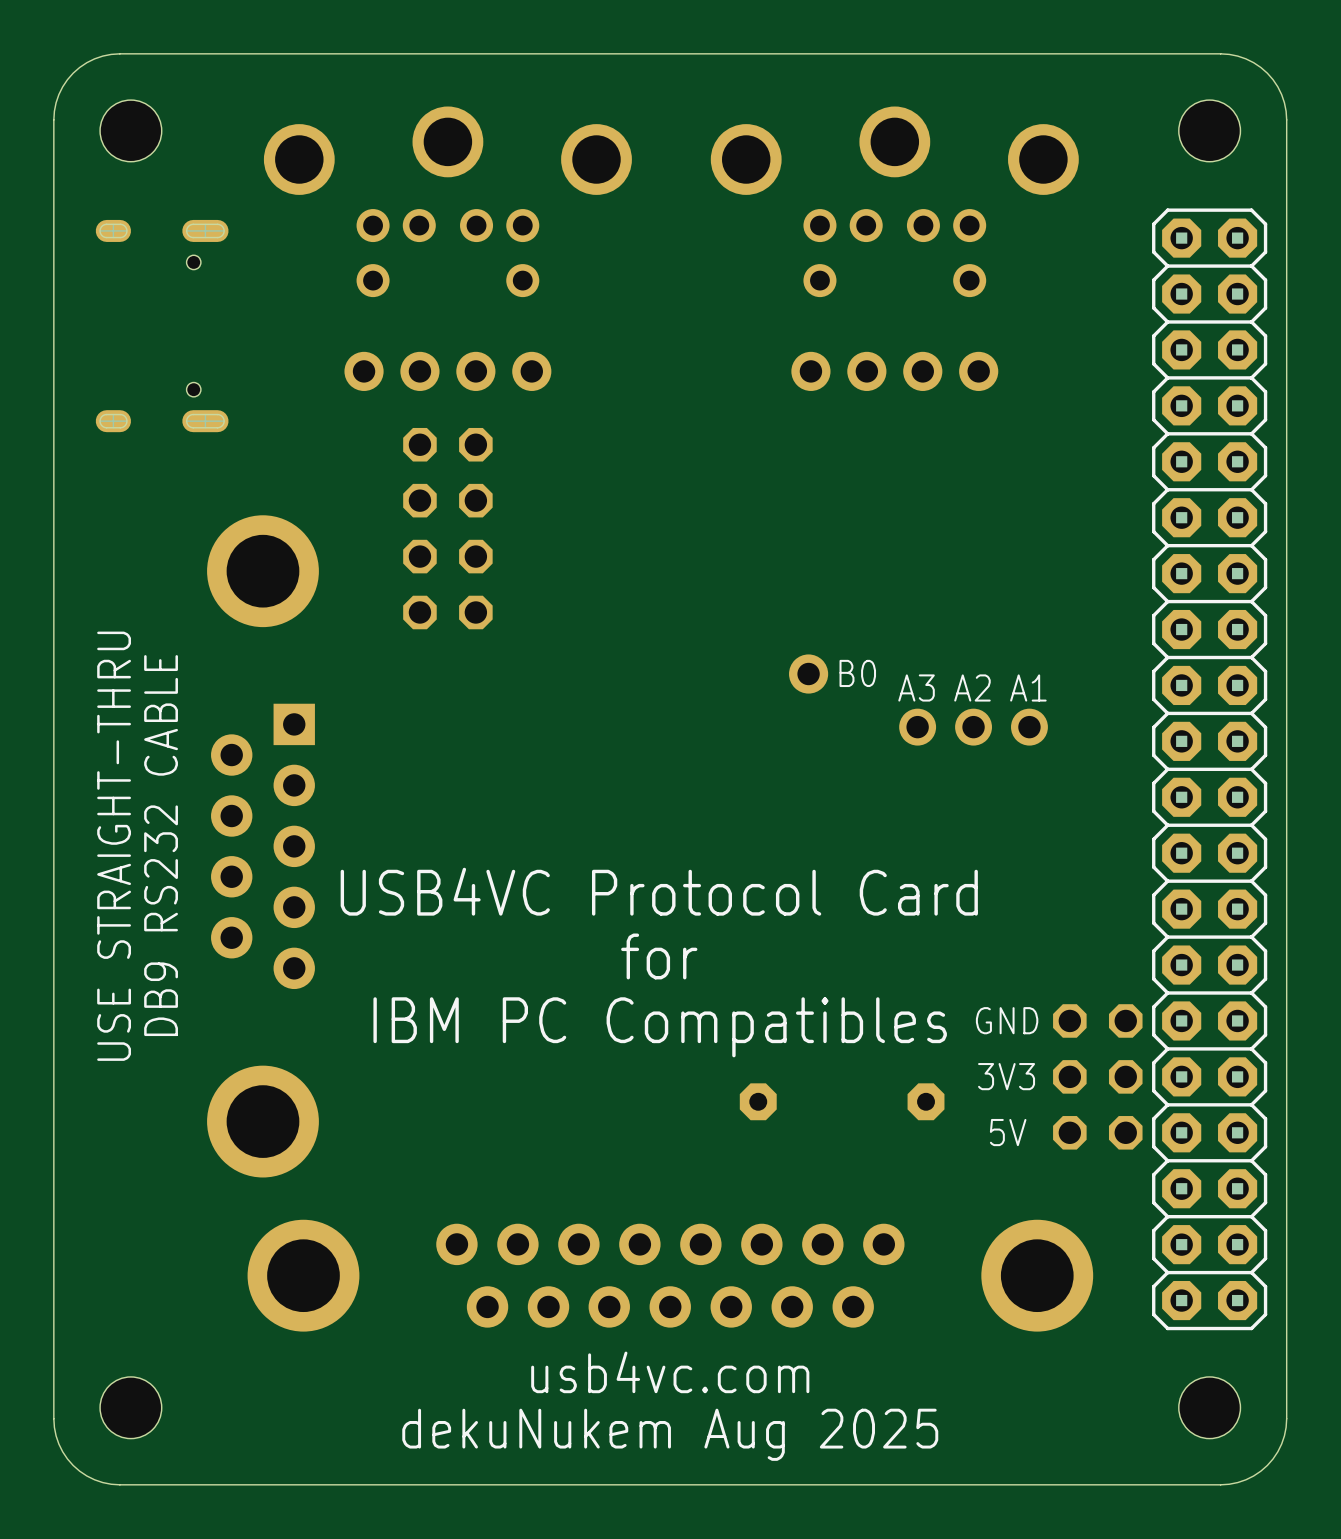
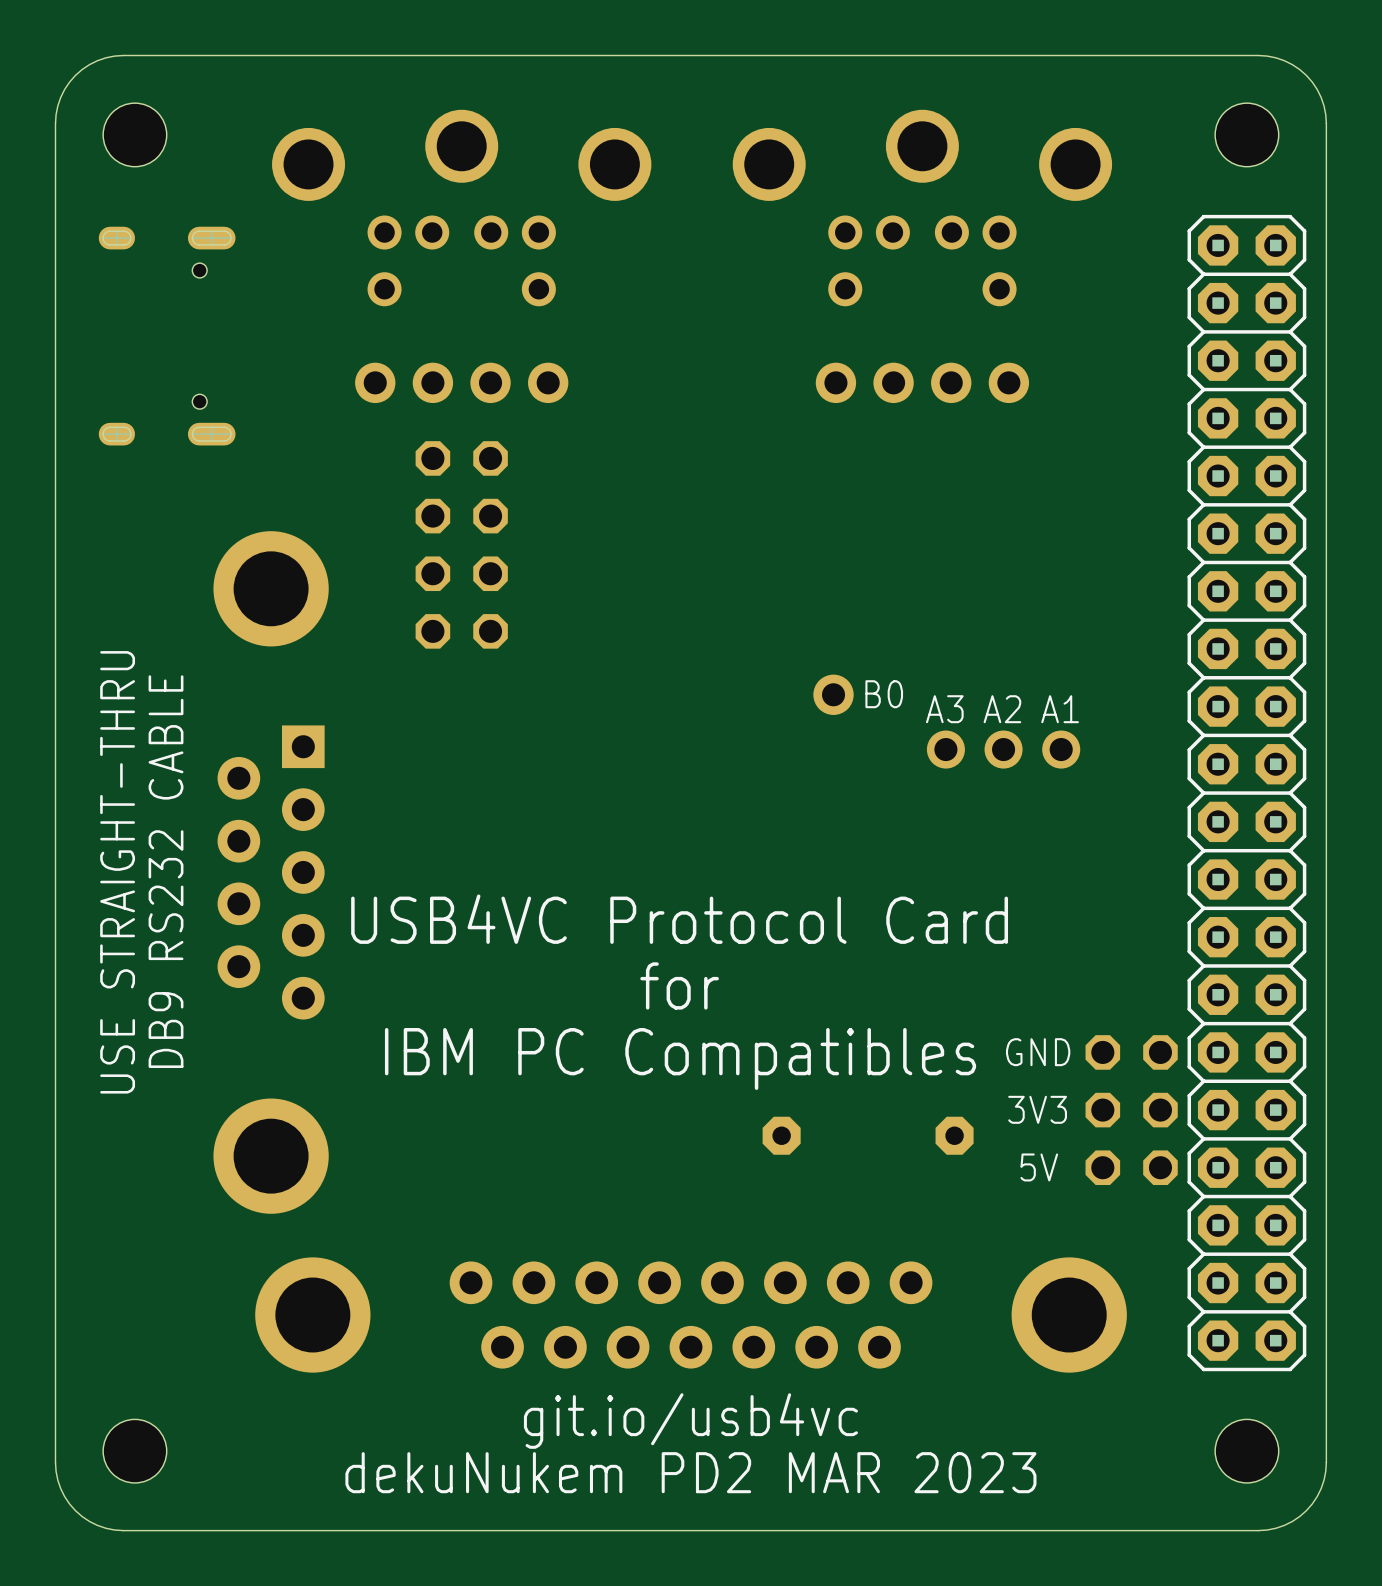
text: usb4vc.com (670, 1372) -> git.io/usb4vc (690, 1421)
text: dekuNukem Aug 2025 (670, 1434) -> dekuNukem PD2 MAR 2023 (690, 1472)

